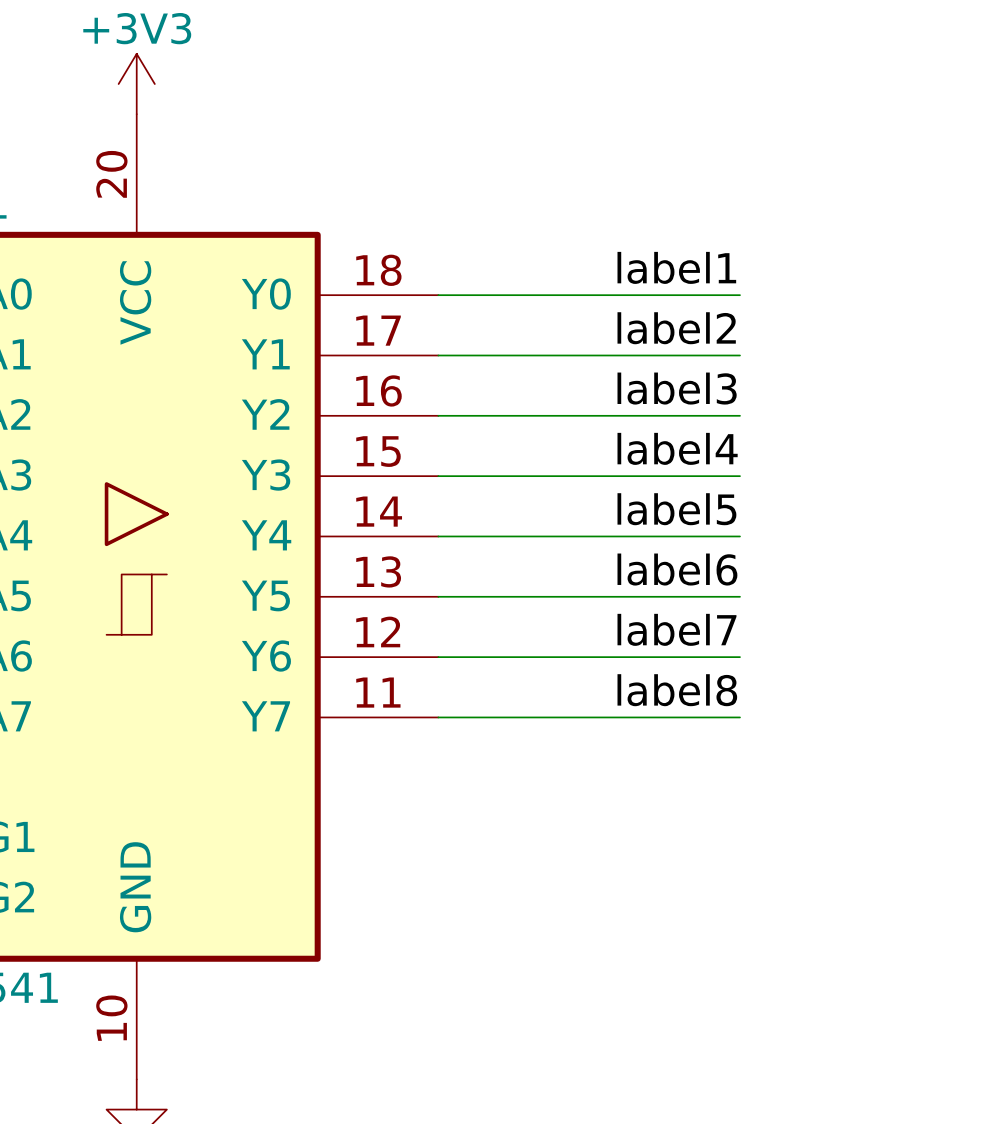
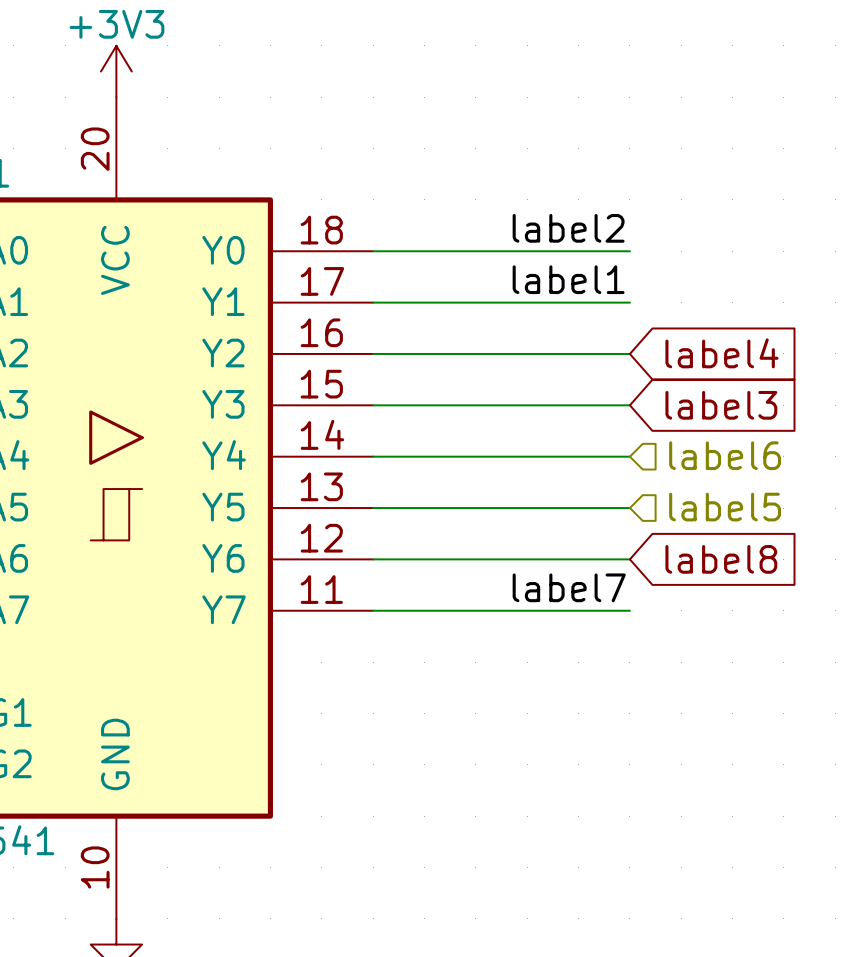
label: label1 (676, 267) -> label2 (568, 228)
label: label2 (676, 328) -> label1 (568, 279)
label: label3 (677, 388) -> none
global label: none -> label4 (721, 353)
label: label4 (677, 448) -> none
global label: none -> label3 (721, 405)
label: label5 (676, 509) -> none
hierarchical label: none -> label6 (725, 455)
label: label6 (677, 569) -> none
hierarchical label: none -> label5 (725, 507)
label: label7 (676, 629) -> none
global label: none -> label8 (721, 559)
label: label8 (677, 690) -> label7 (569, 587)

